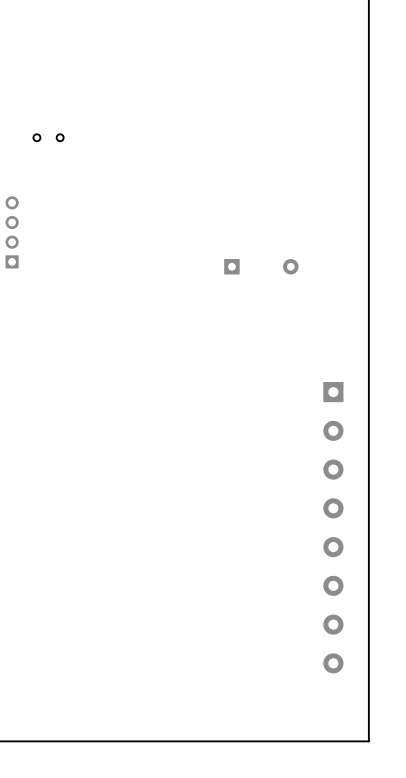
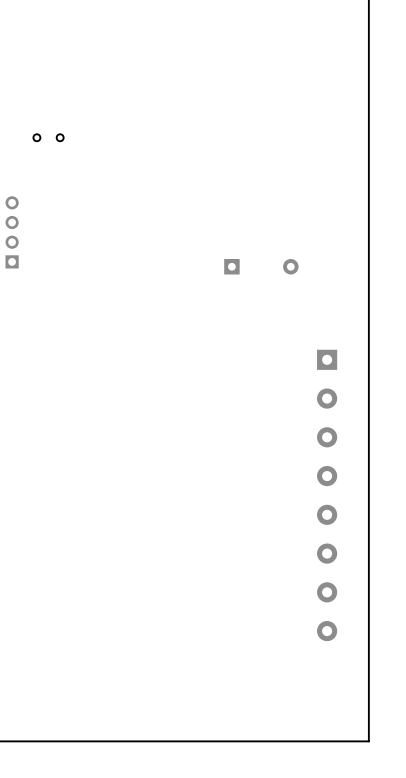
part position: (333, 527) -> (327, 495)

